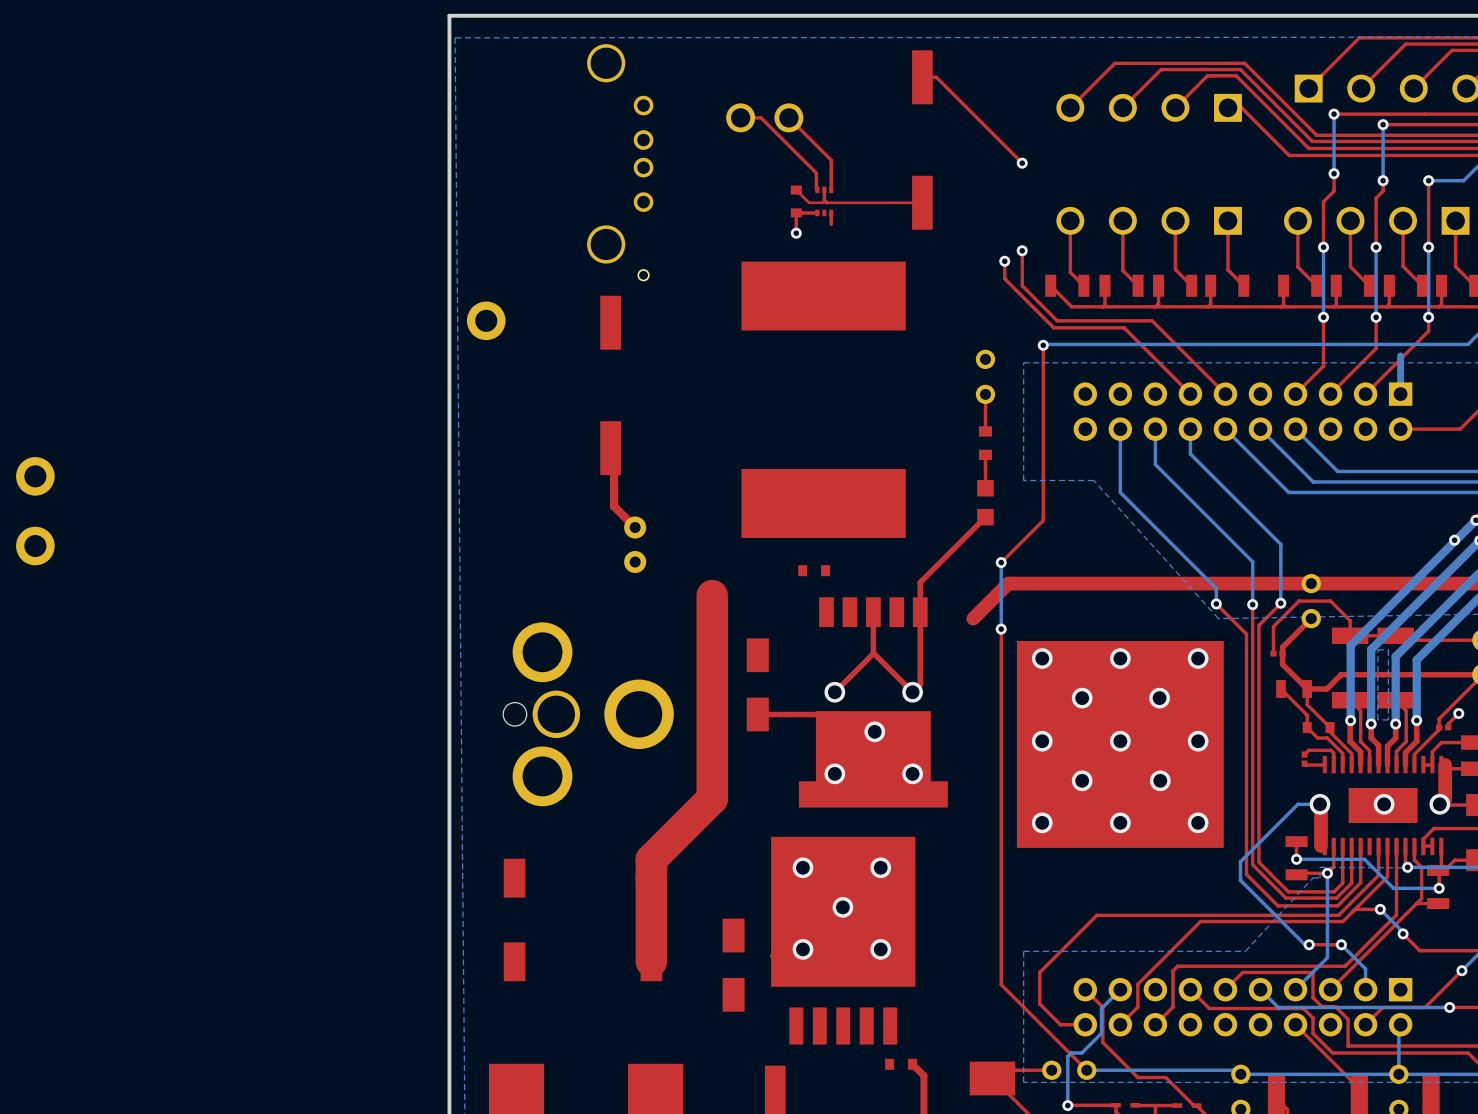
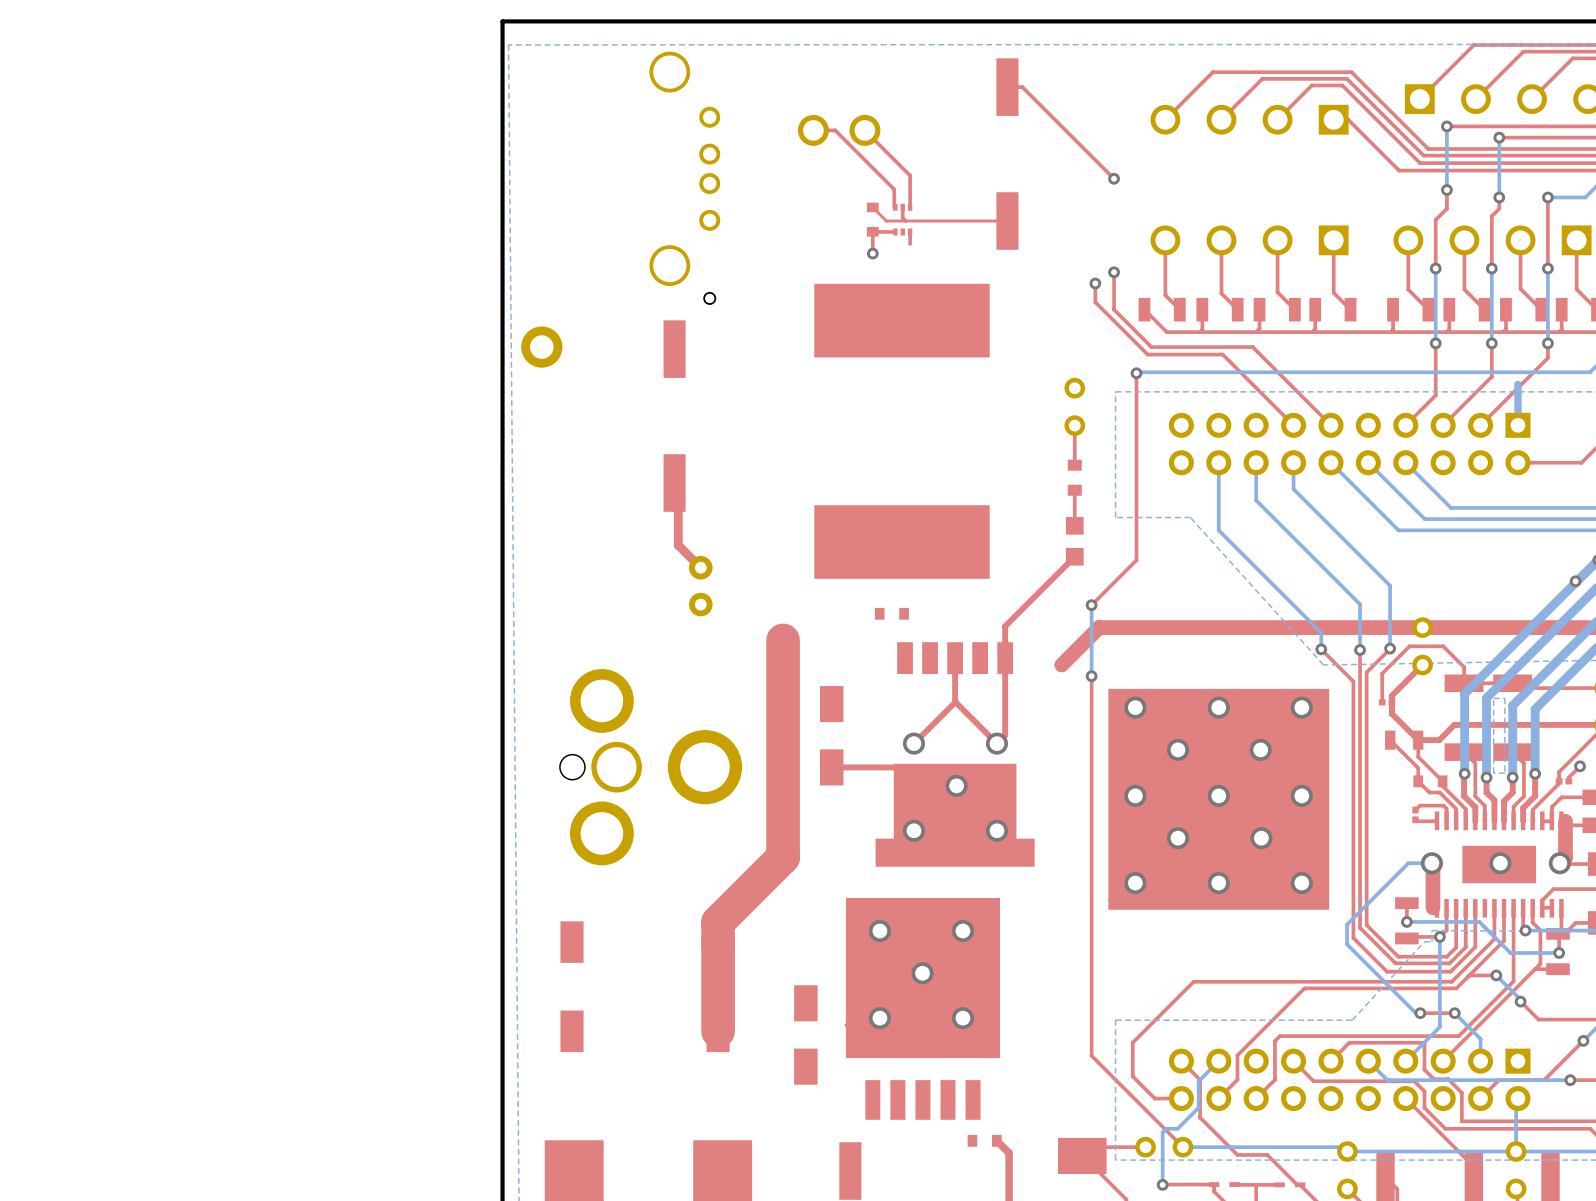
part: (35, 476) -> none
part: (35, 546) -> none

